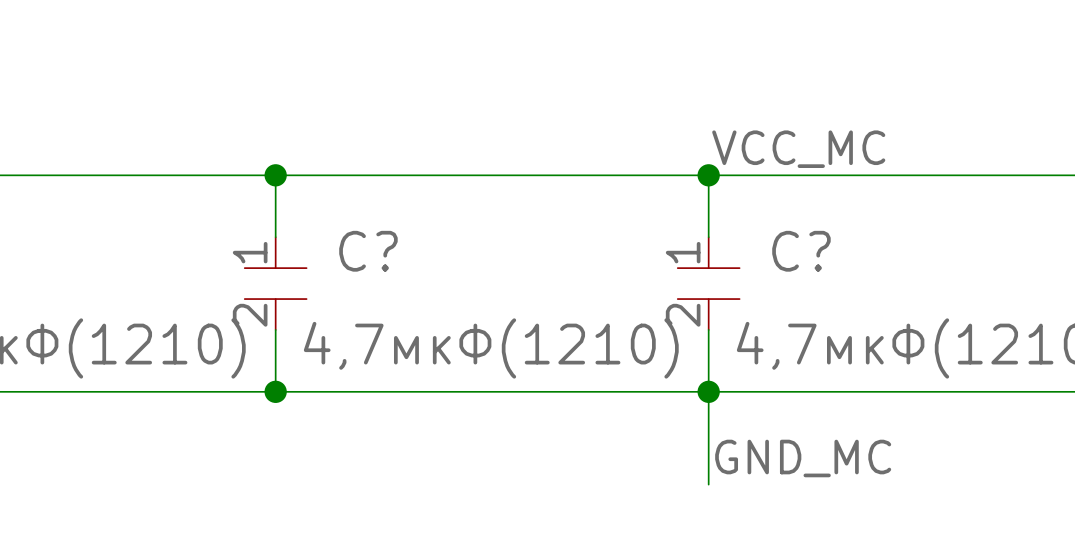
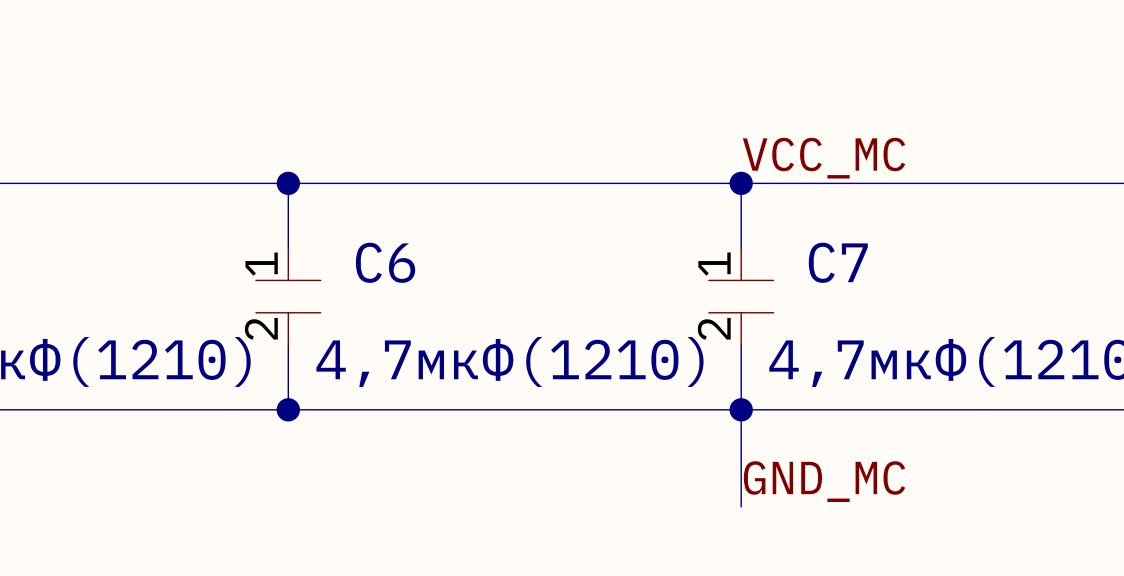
C? name: C? (368, 251) -> C6 (385, 262)
C? name: C? (801, 251) -> C7 (838, 262)

